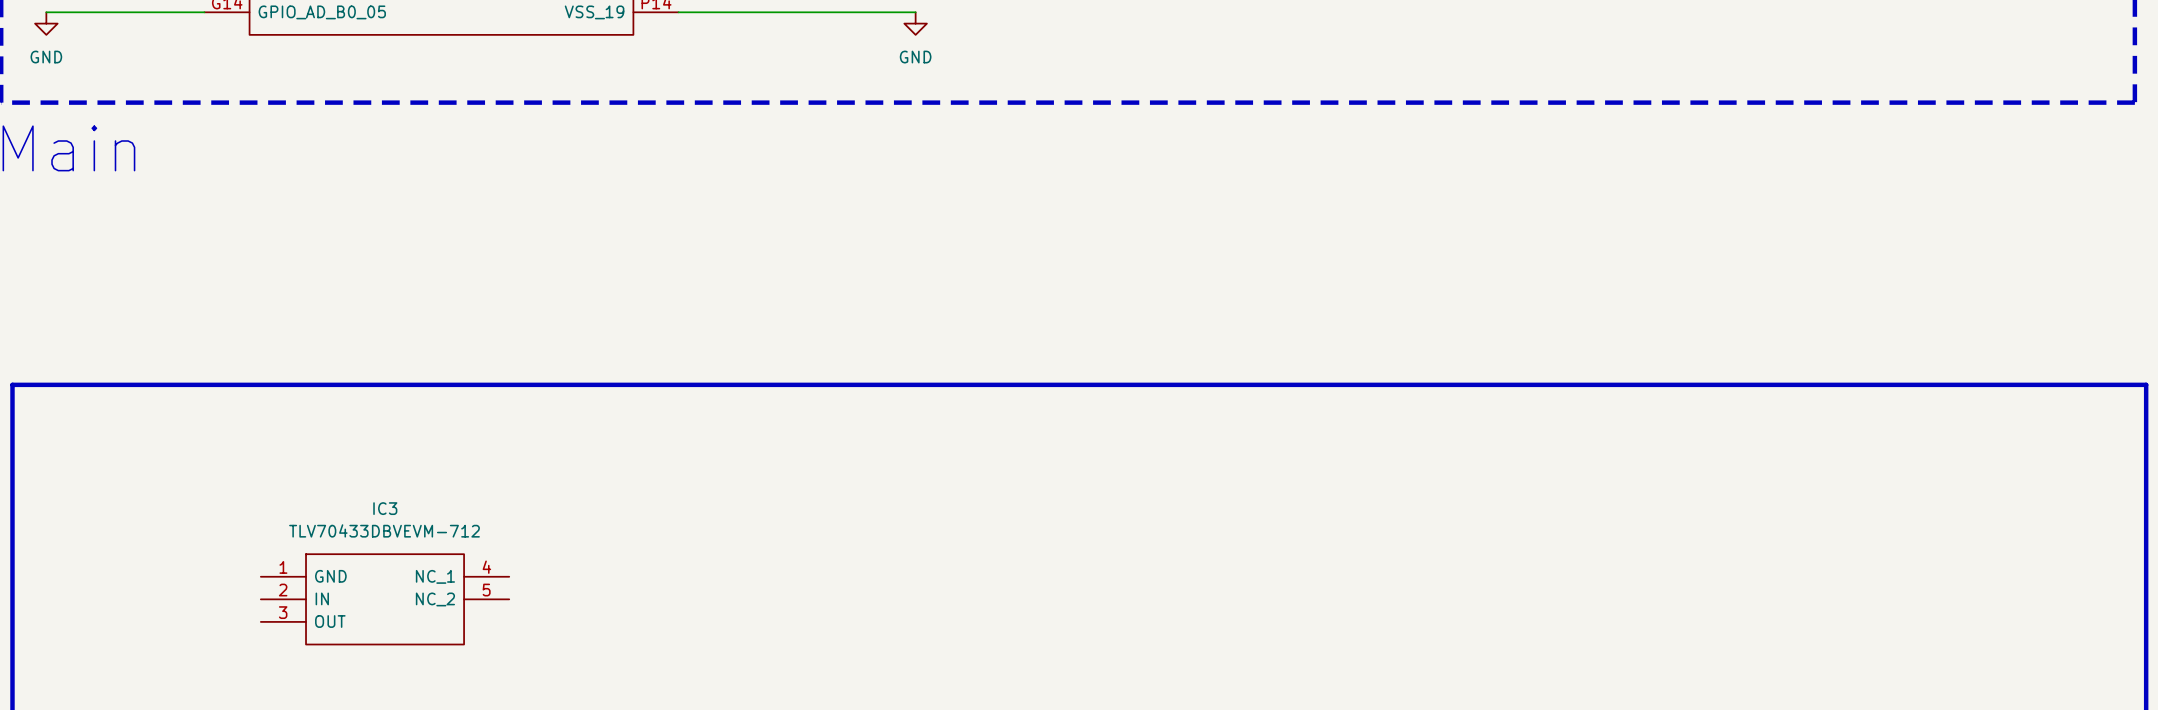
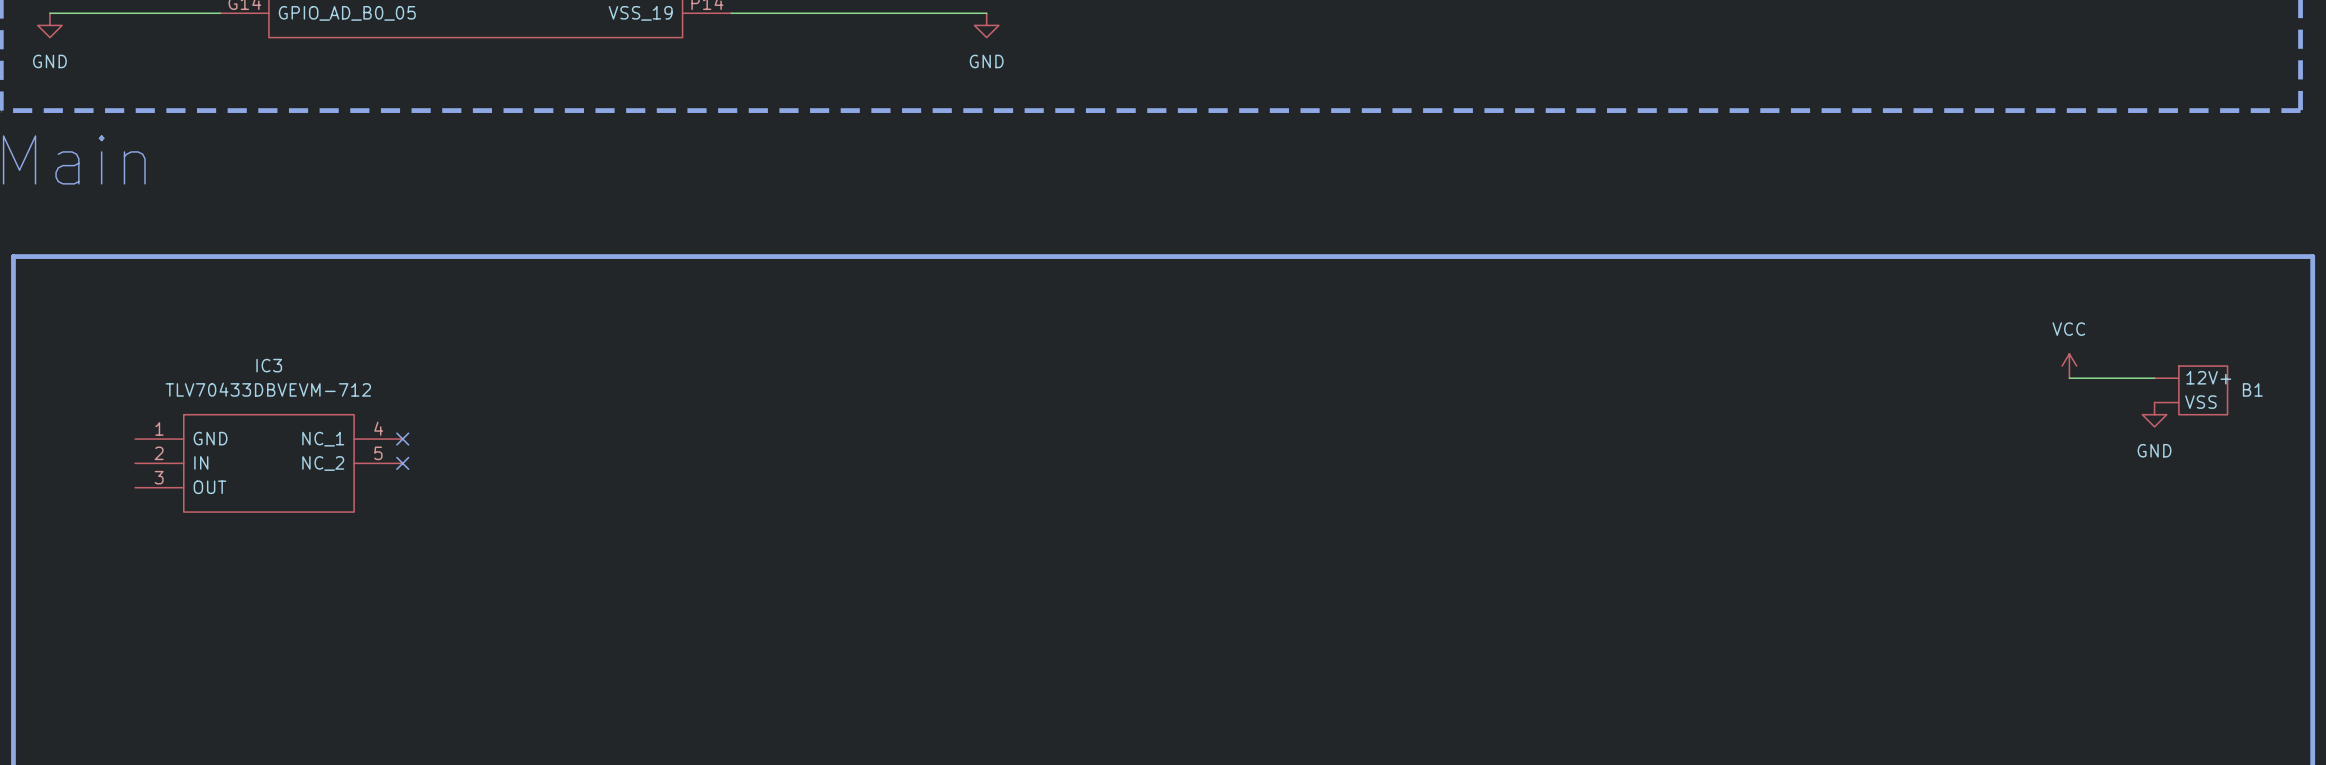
power symbol: none -> VCC (2069, 366)
wire: none -> (2069, 378) (2154, 378)
B1: none -> (2191, 390)
line: (12, 384) (2146, 384) -> (13, 414) (13, 256) (2312, 256) (2312, 414)
power symbol: none -> GND (2154, 414)
no-connect mark: none -> (402, 439)
no-connect mark: none -> (402, 463)
IC3 position: (385, 599) -> (268, 463)

